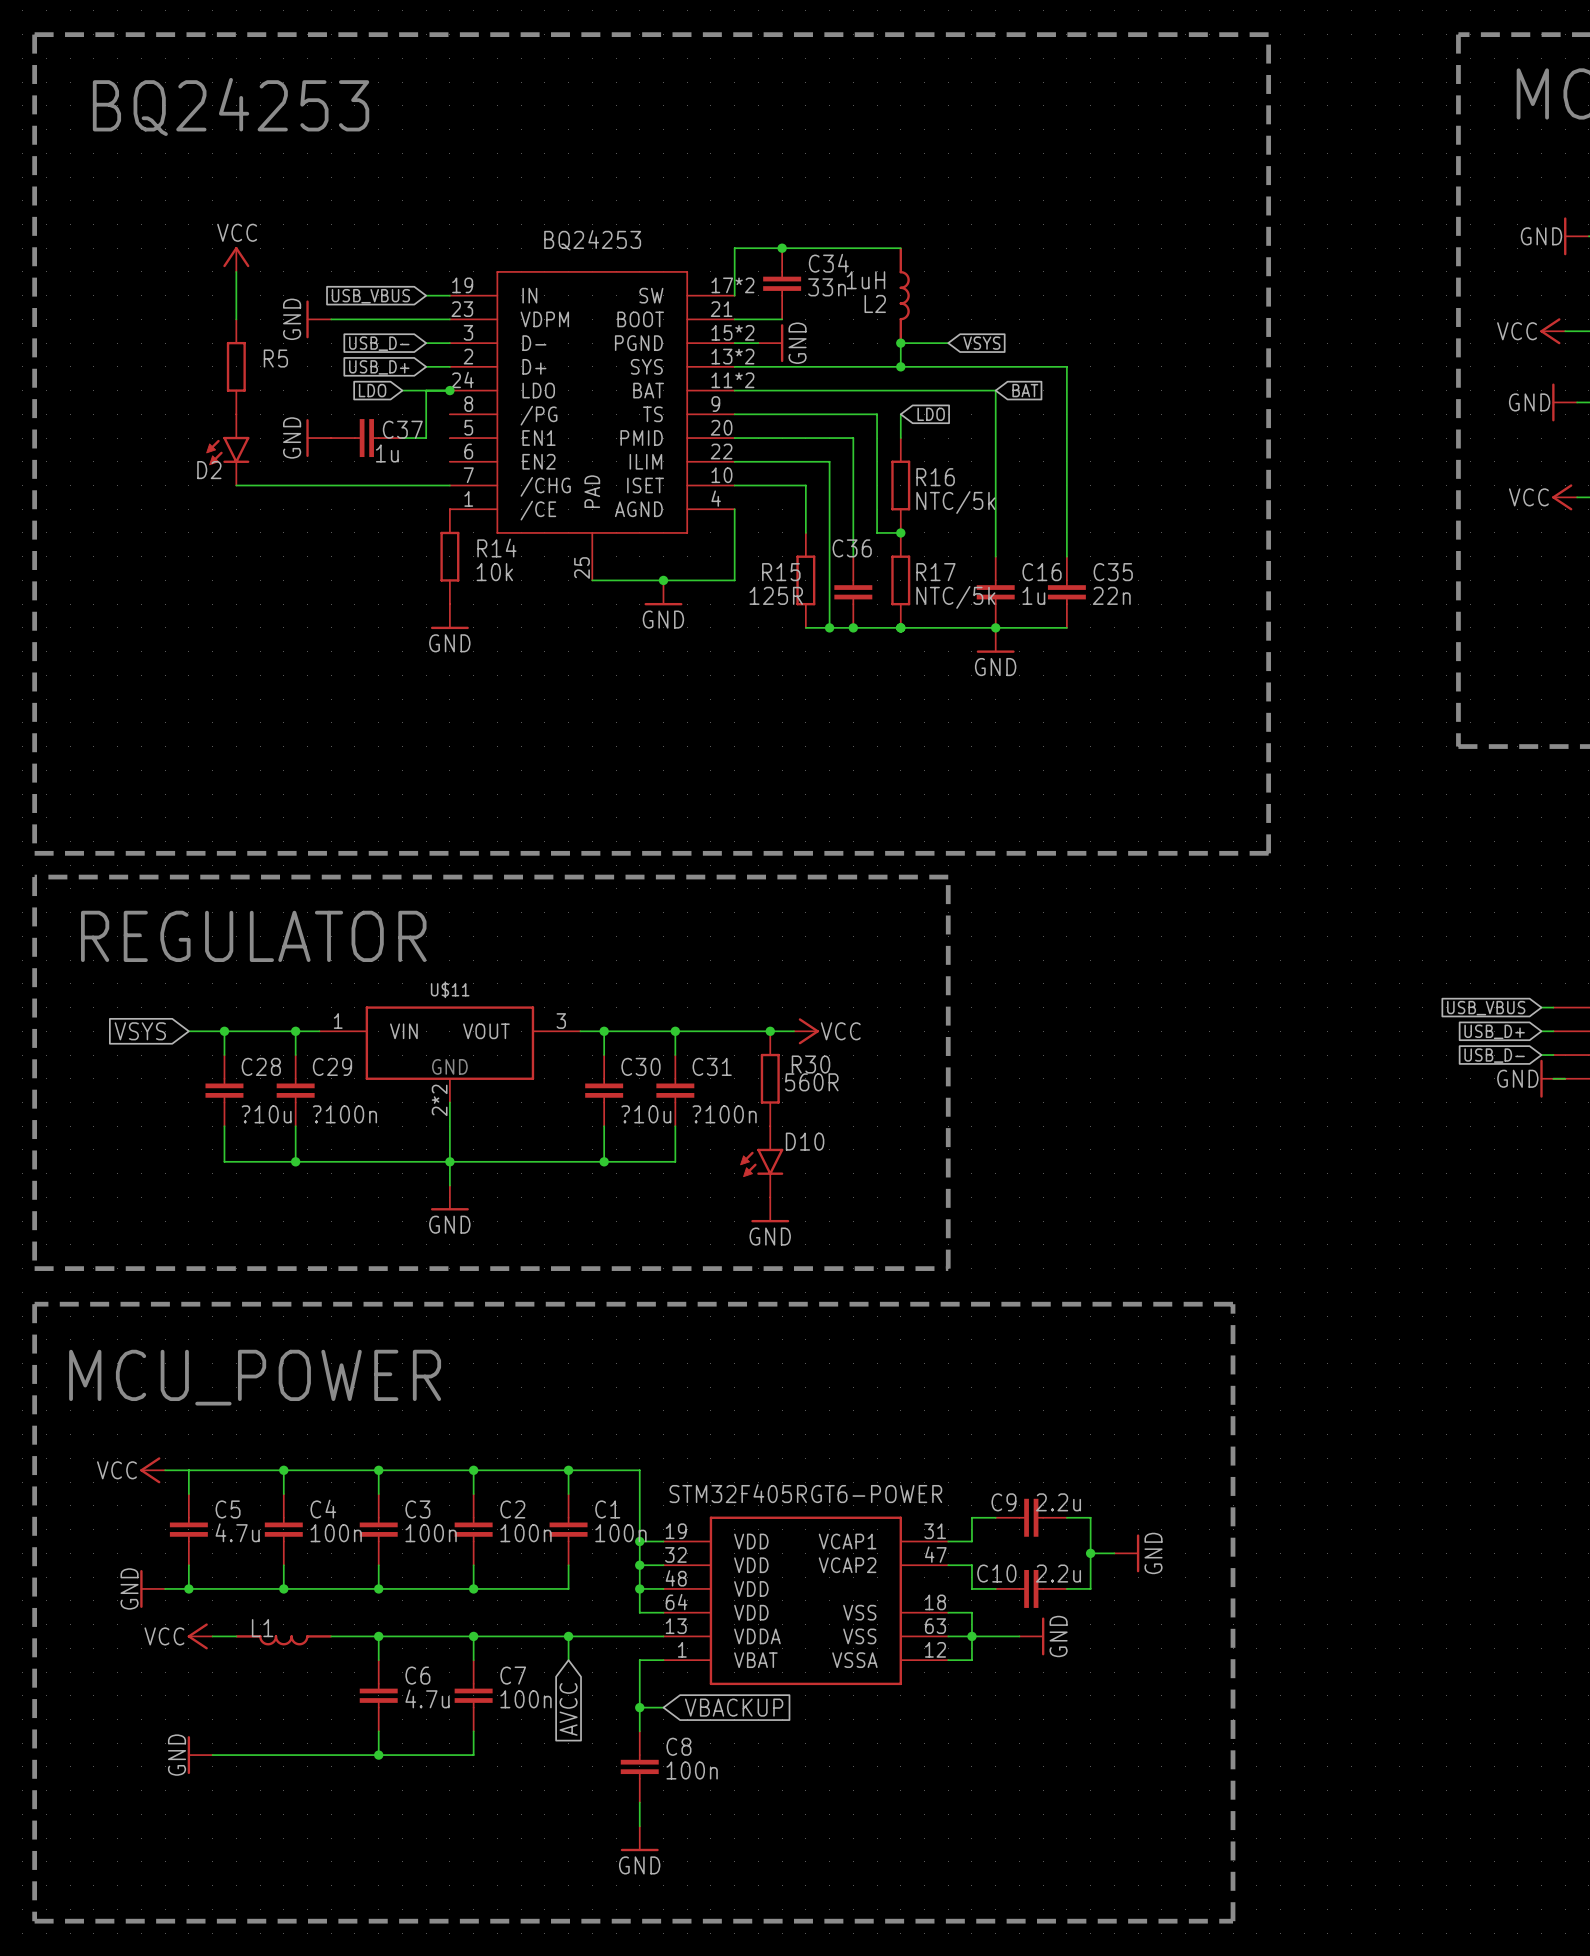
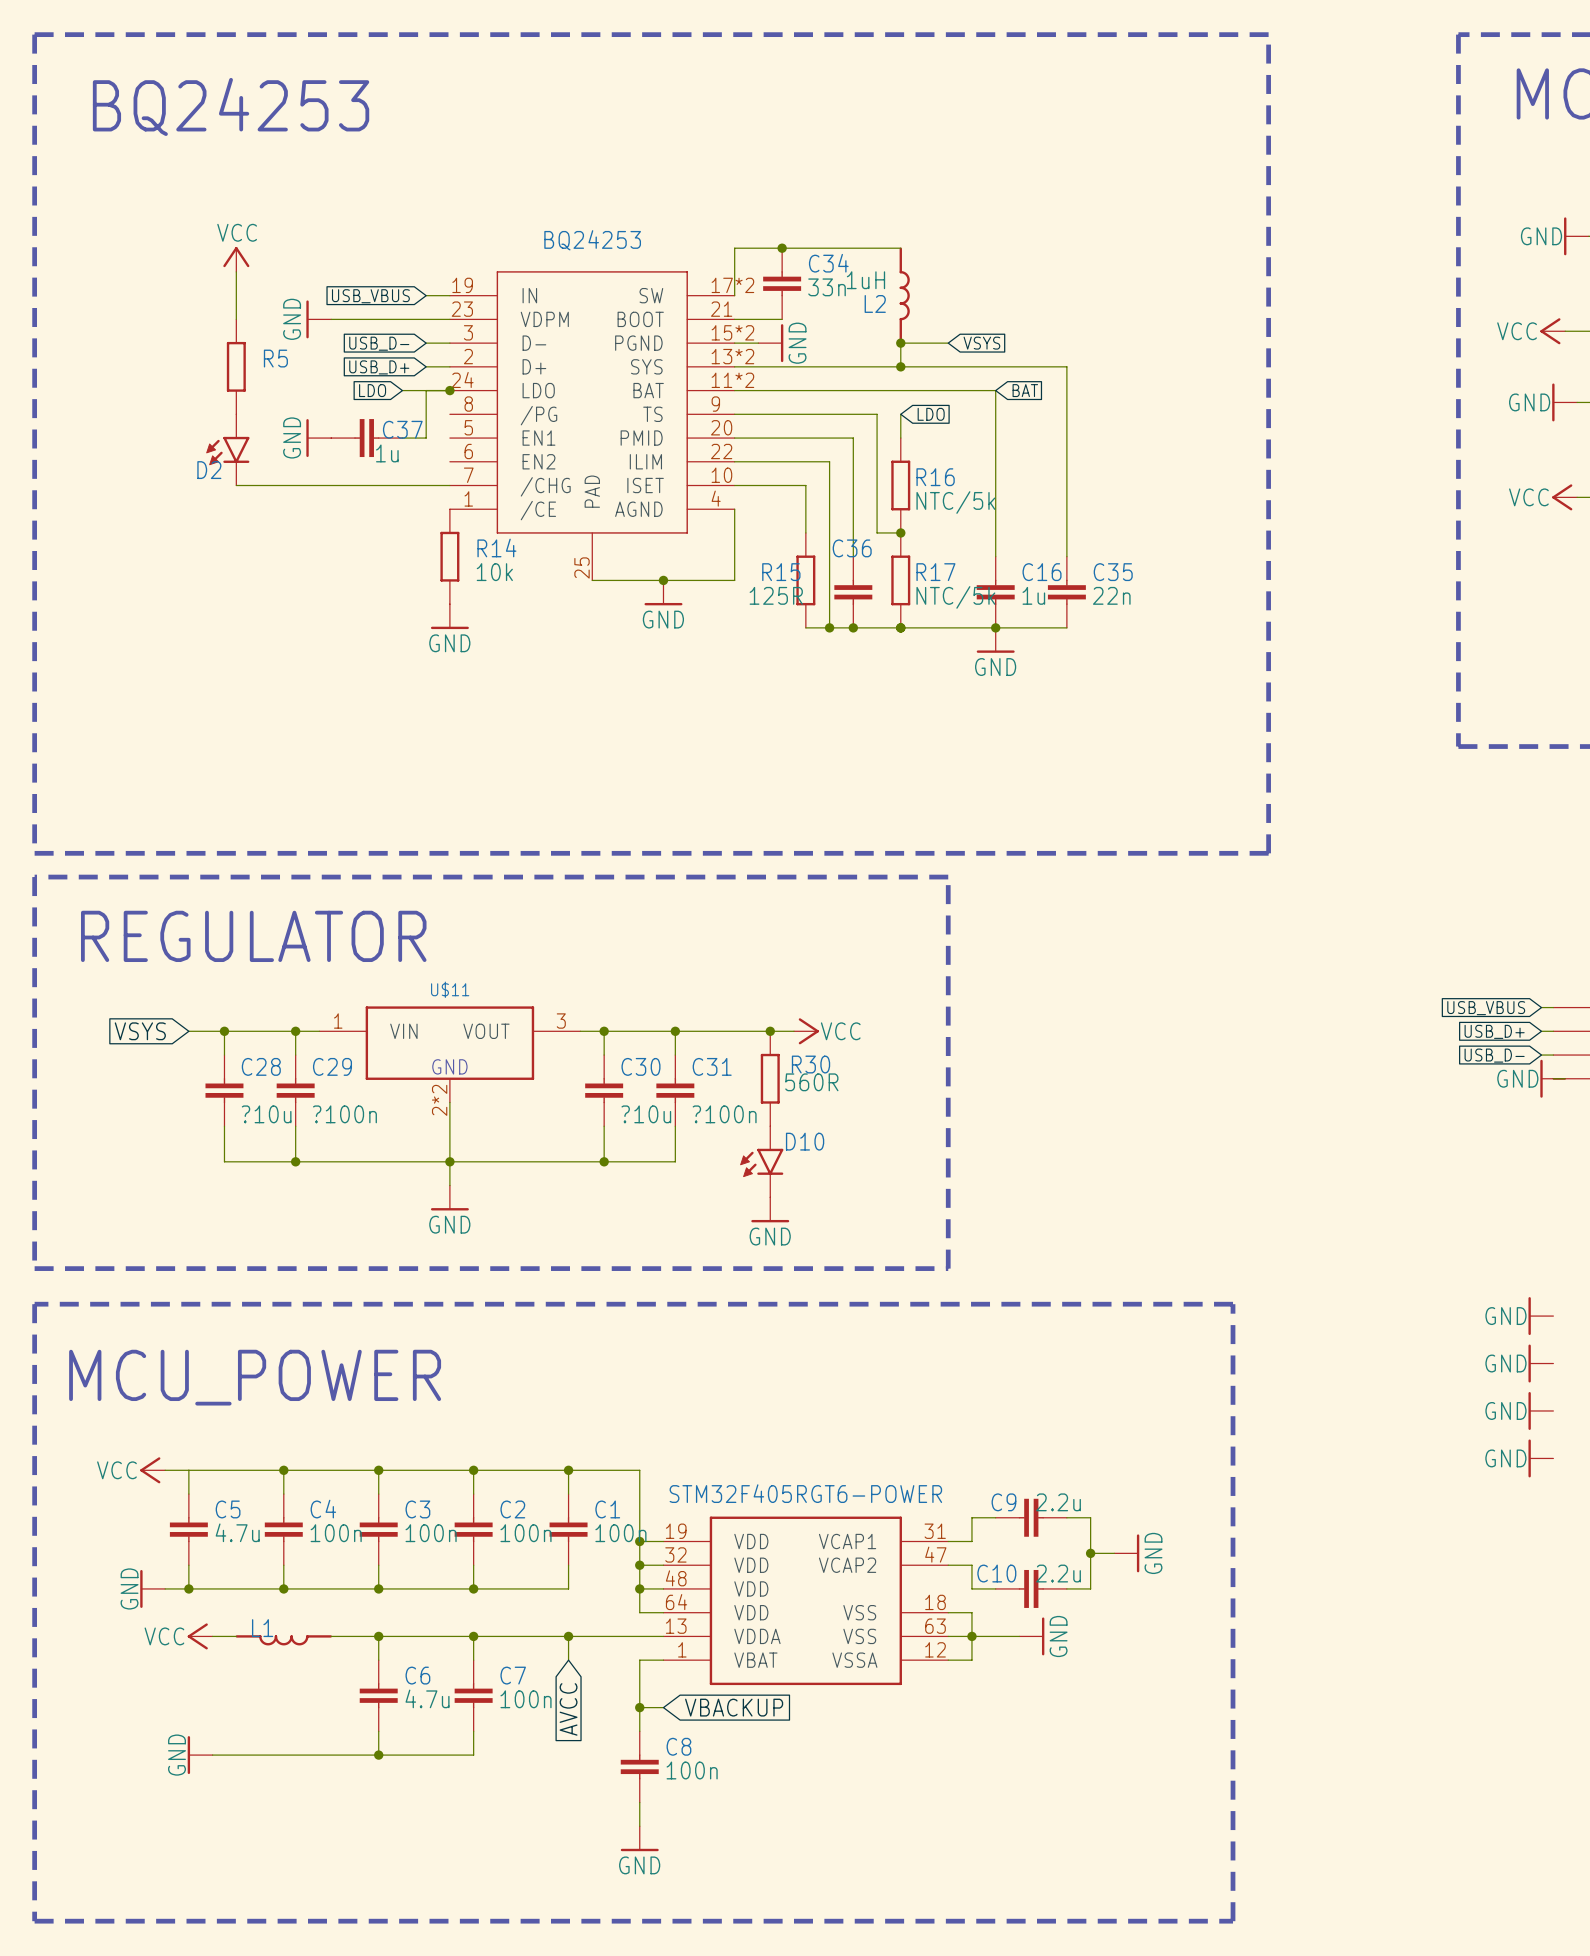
power symbol: none -> GND (1540, 1316)
power symbol: none -> GND (1540, 1363)
power symbol: none -> GND (1540, 1410)
power symbol: none -> GND (1540, 1458)

